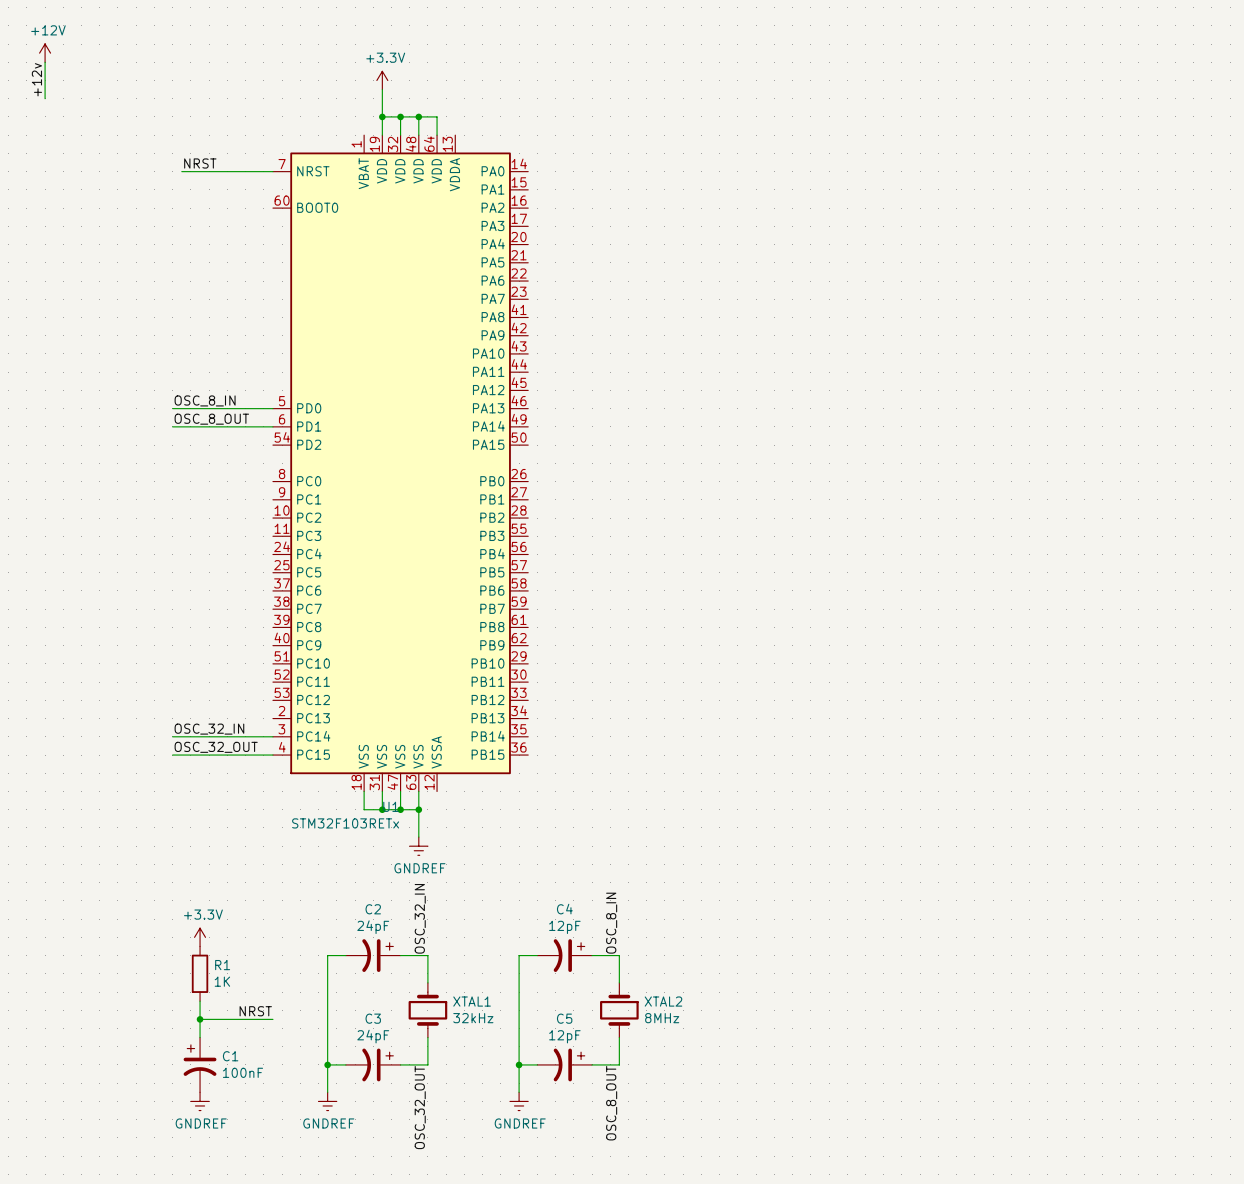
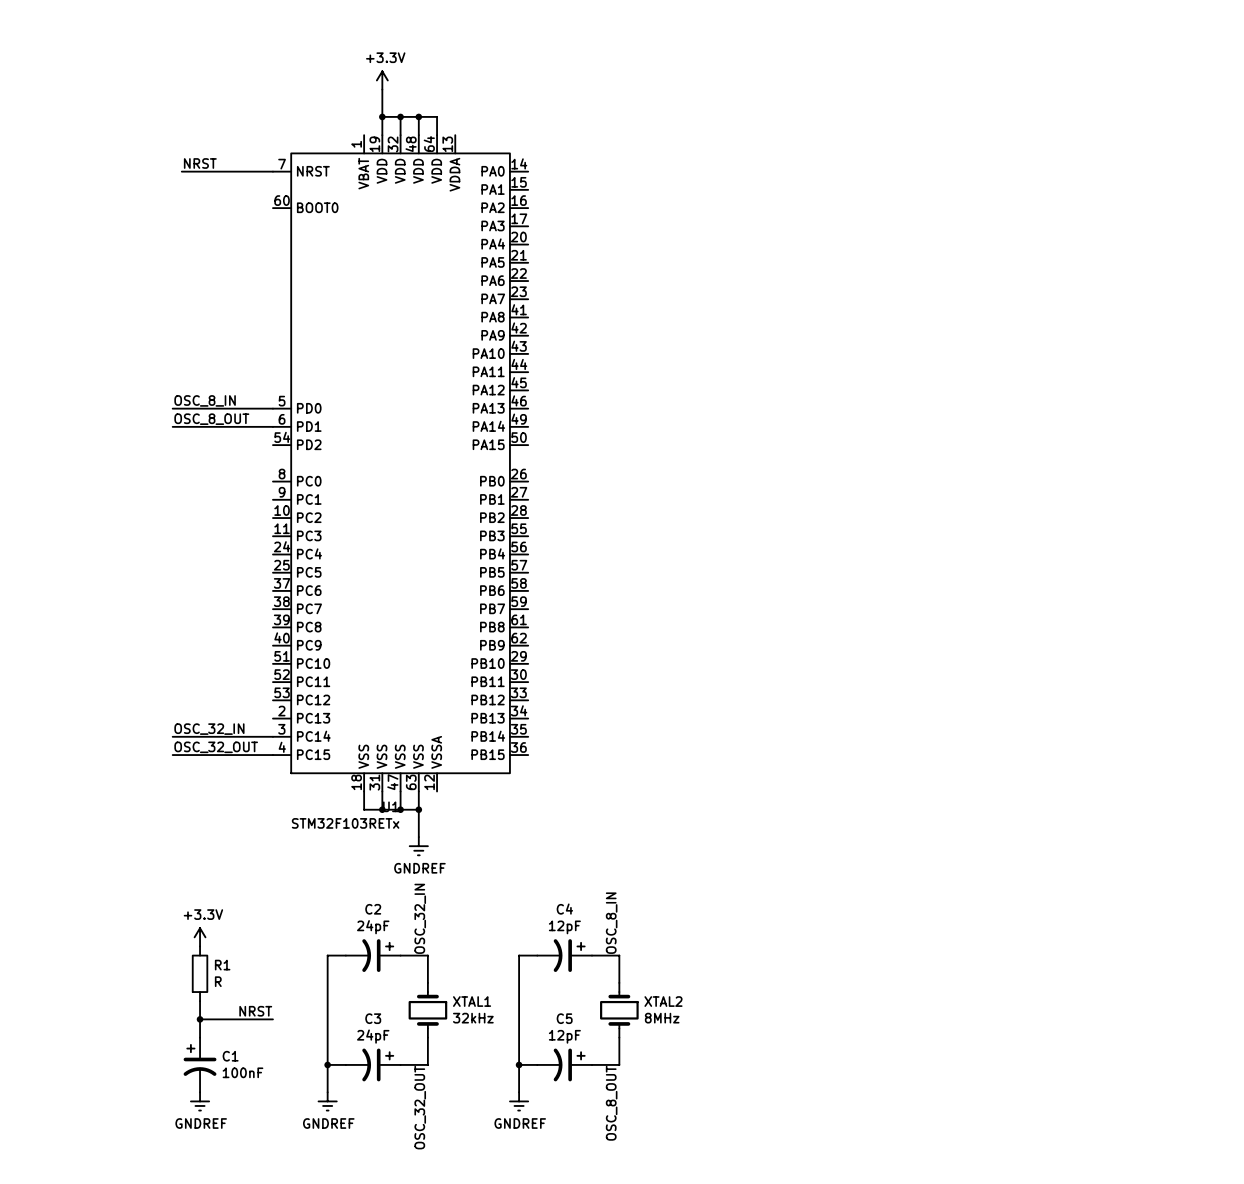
power symbol: +12V (45, 53) -> none
wire: (45, 62) (45, 98) -> none
label: +12v (36, 79) -> none
R1 value: 1K (222, 981) -> R (218, 981)

